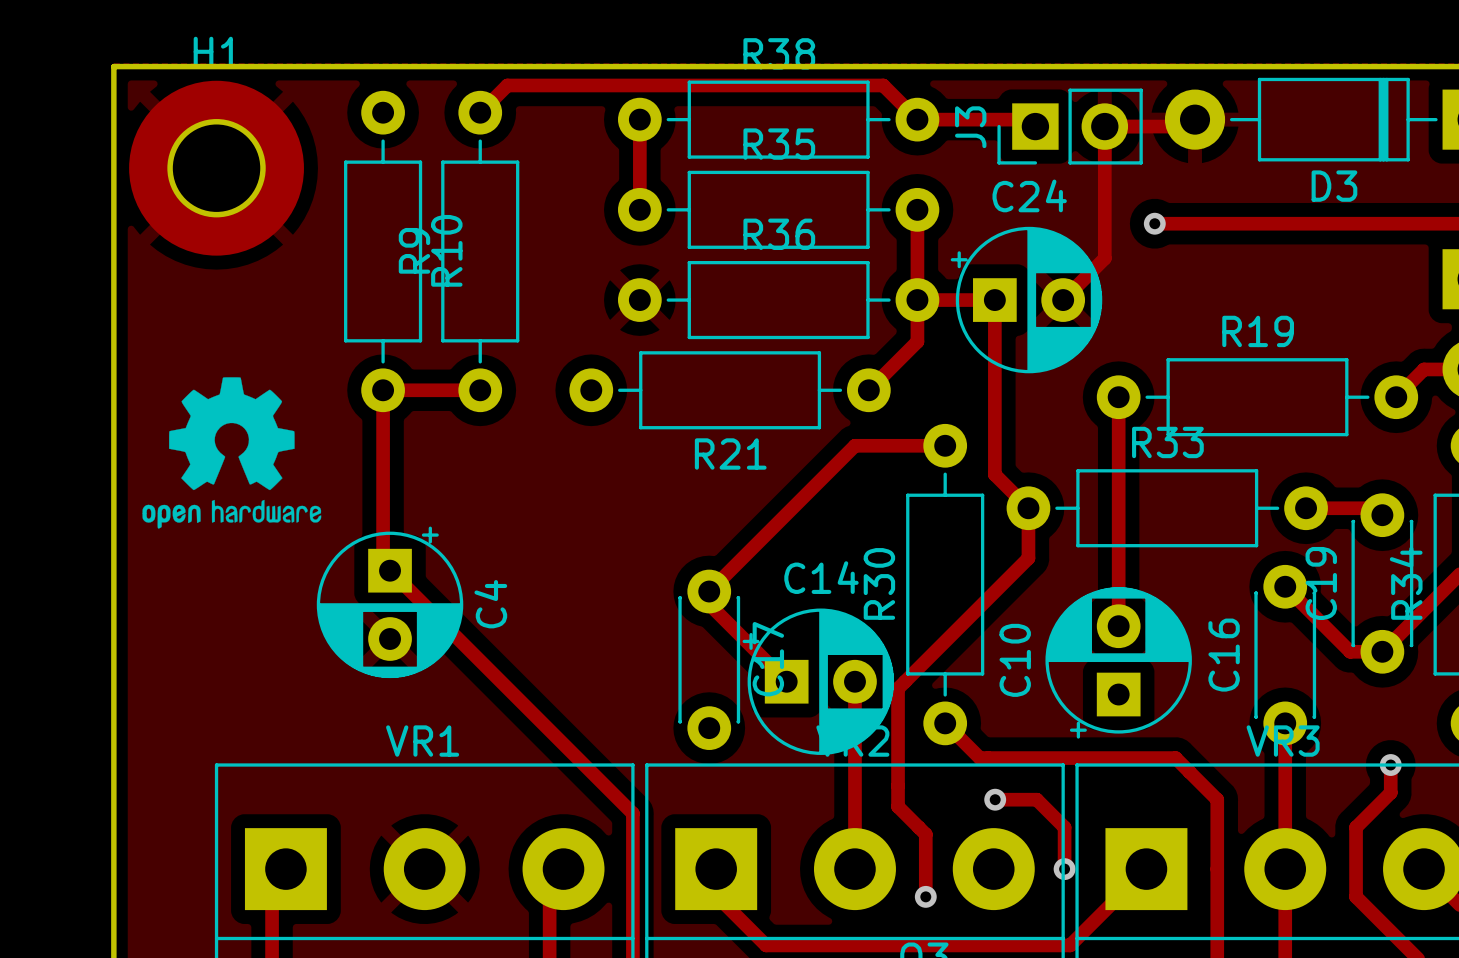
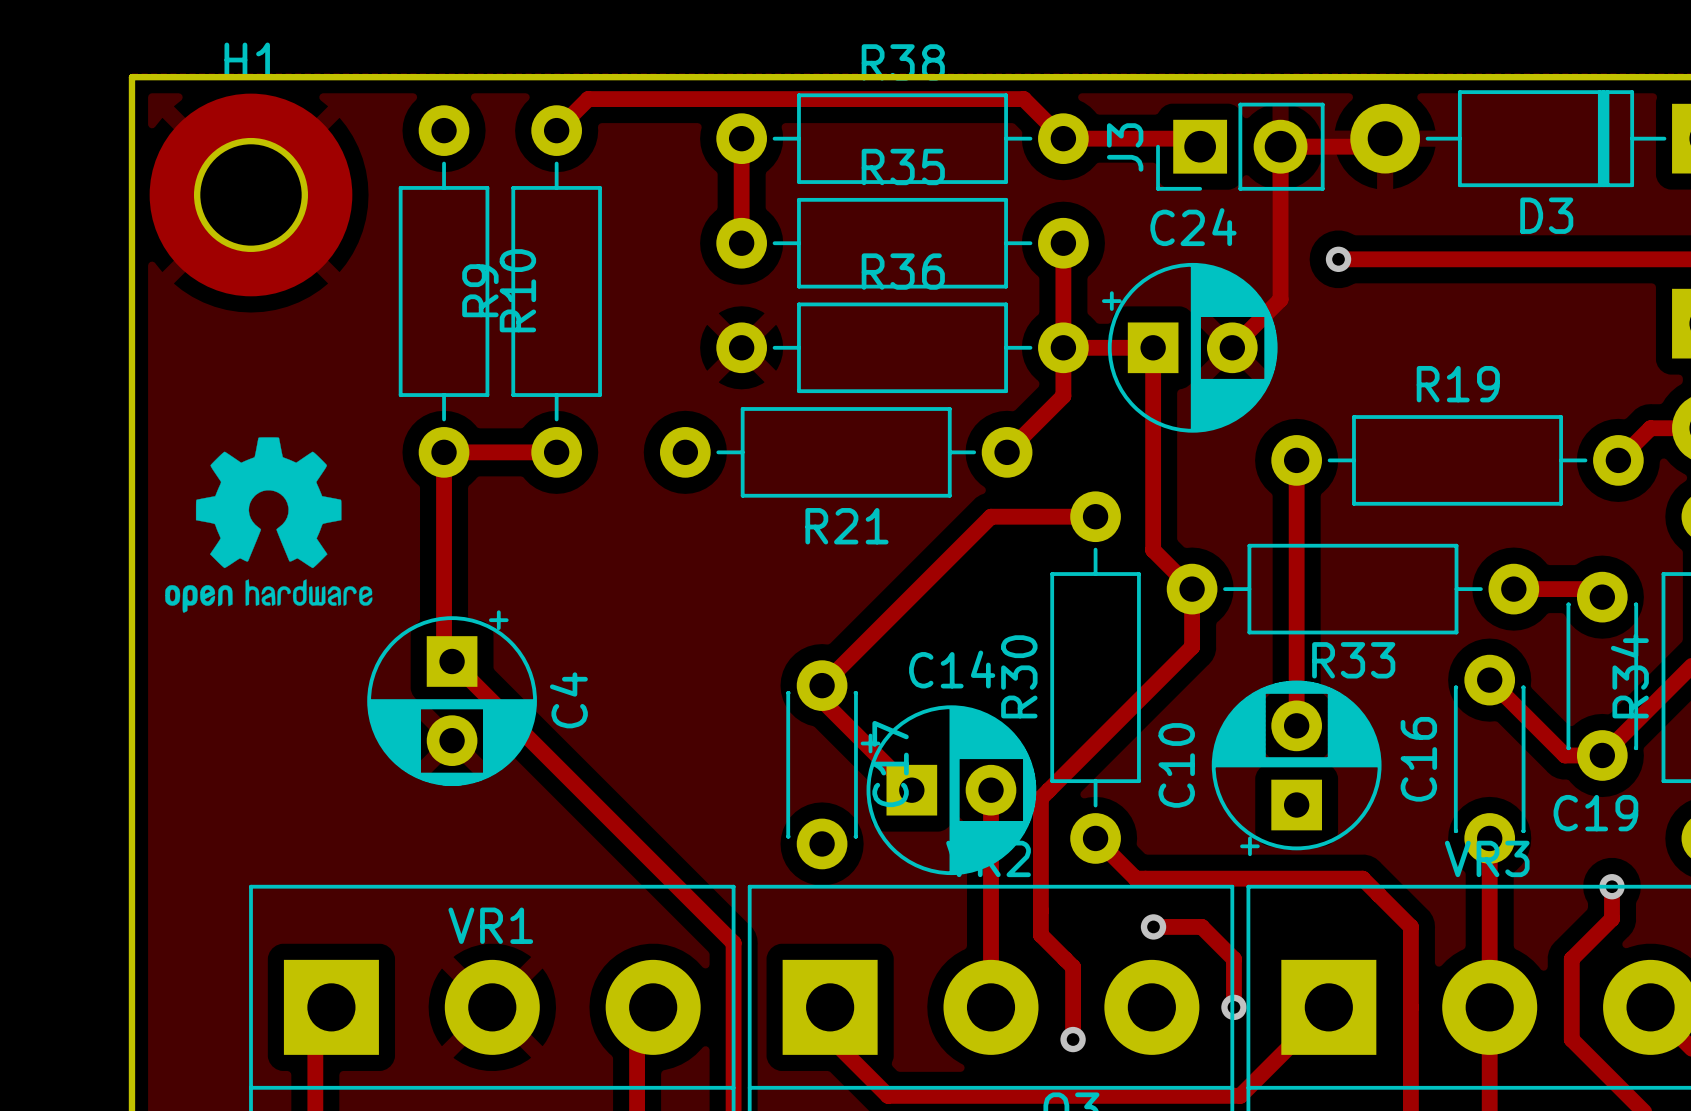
R33 name position: R33 (1167, 442) -> R33 (1353, 660)
C19 name rotation: 0° (1321, 583) -> 90° clockwise (1595, 813)
C19 name position: C19 (1321, 583) -> C19 (1595, 813)
VR1 name position: VR1 (422, 741) -> VR1 (490, 925)

